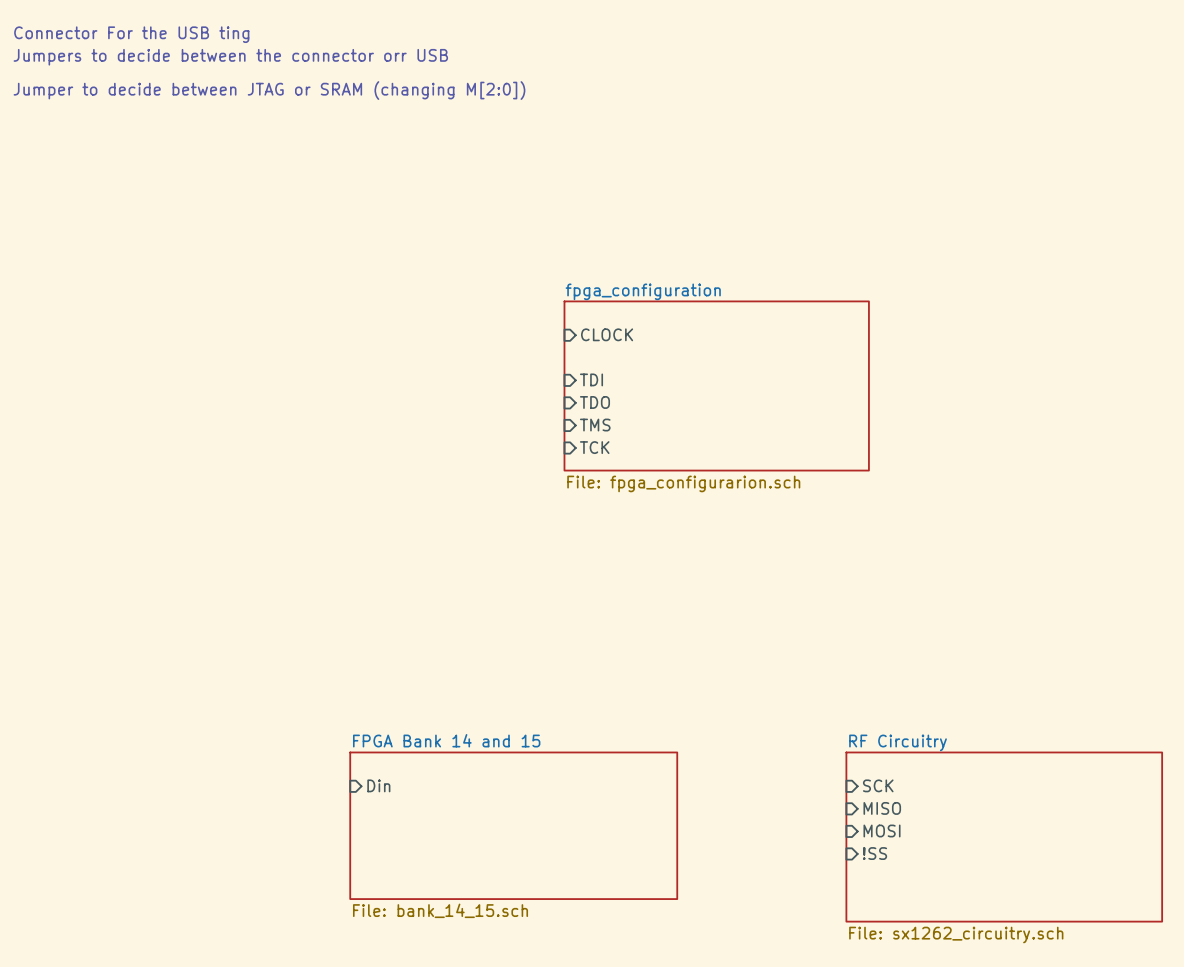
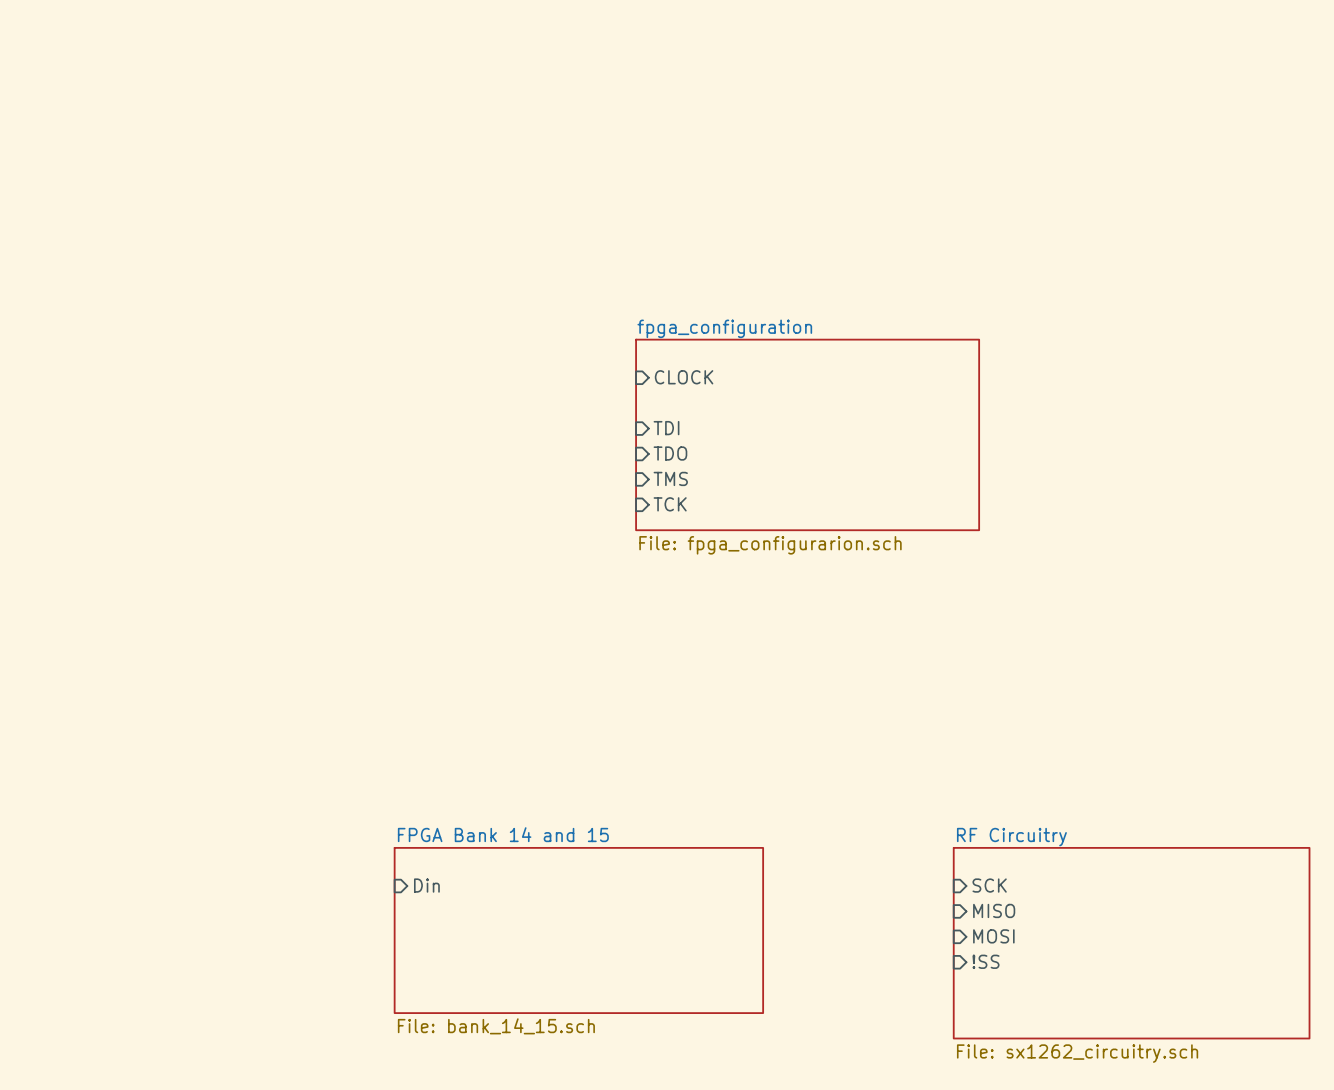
text: Connector For the USB ting (131, 34) -> none
text: Jumpers to decide between the connector orr USB (230, 57) -> none
text: Jumper to decide between JTAG or SRAM (changing M[2:0]) (269, 90) -> none

